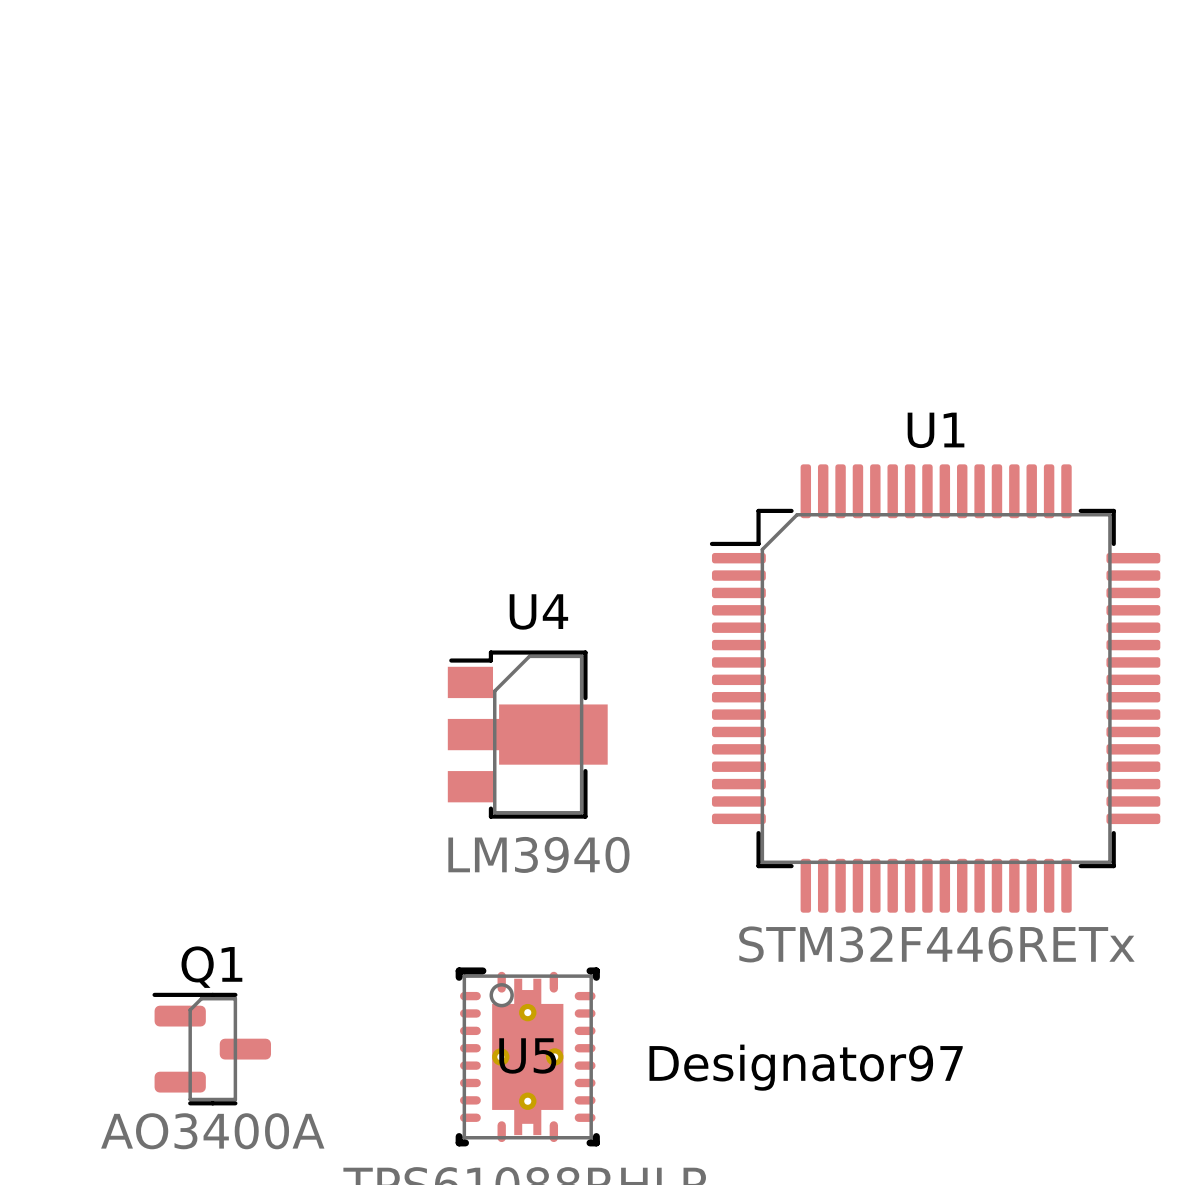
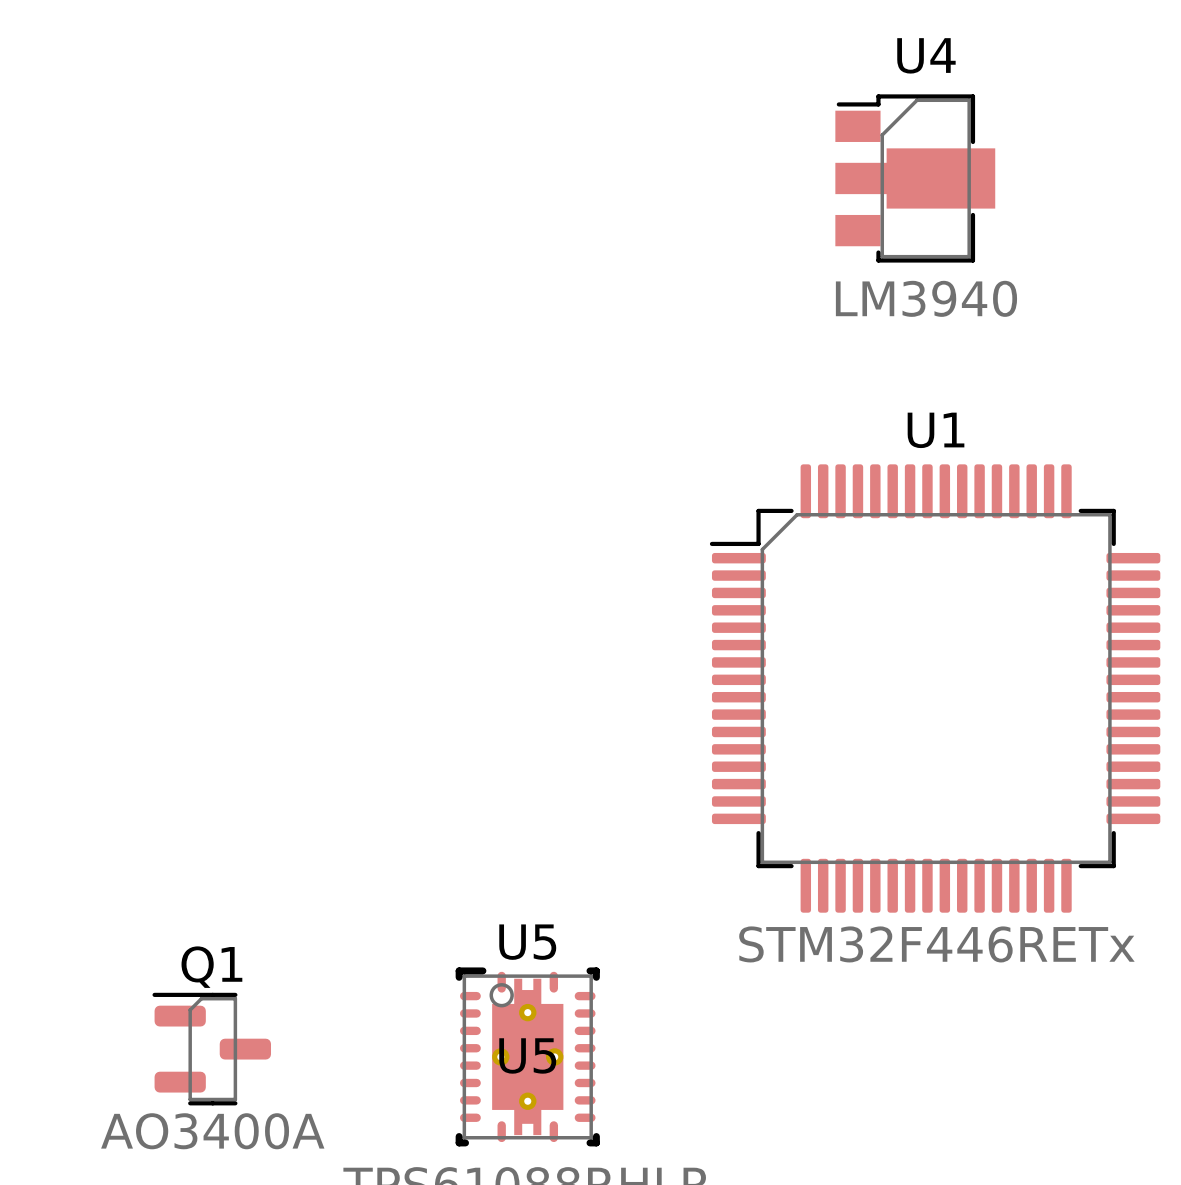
U4 position: (527, 734) -> (915, 178)
U5 text: none -> U5 (527, 942)
U5 text: Designator97 (806, 1067) -> none

